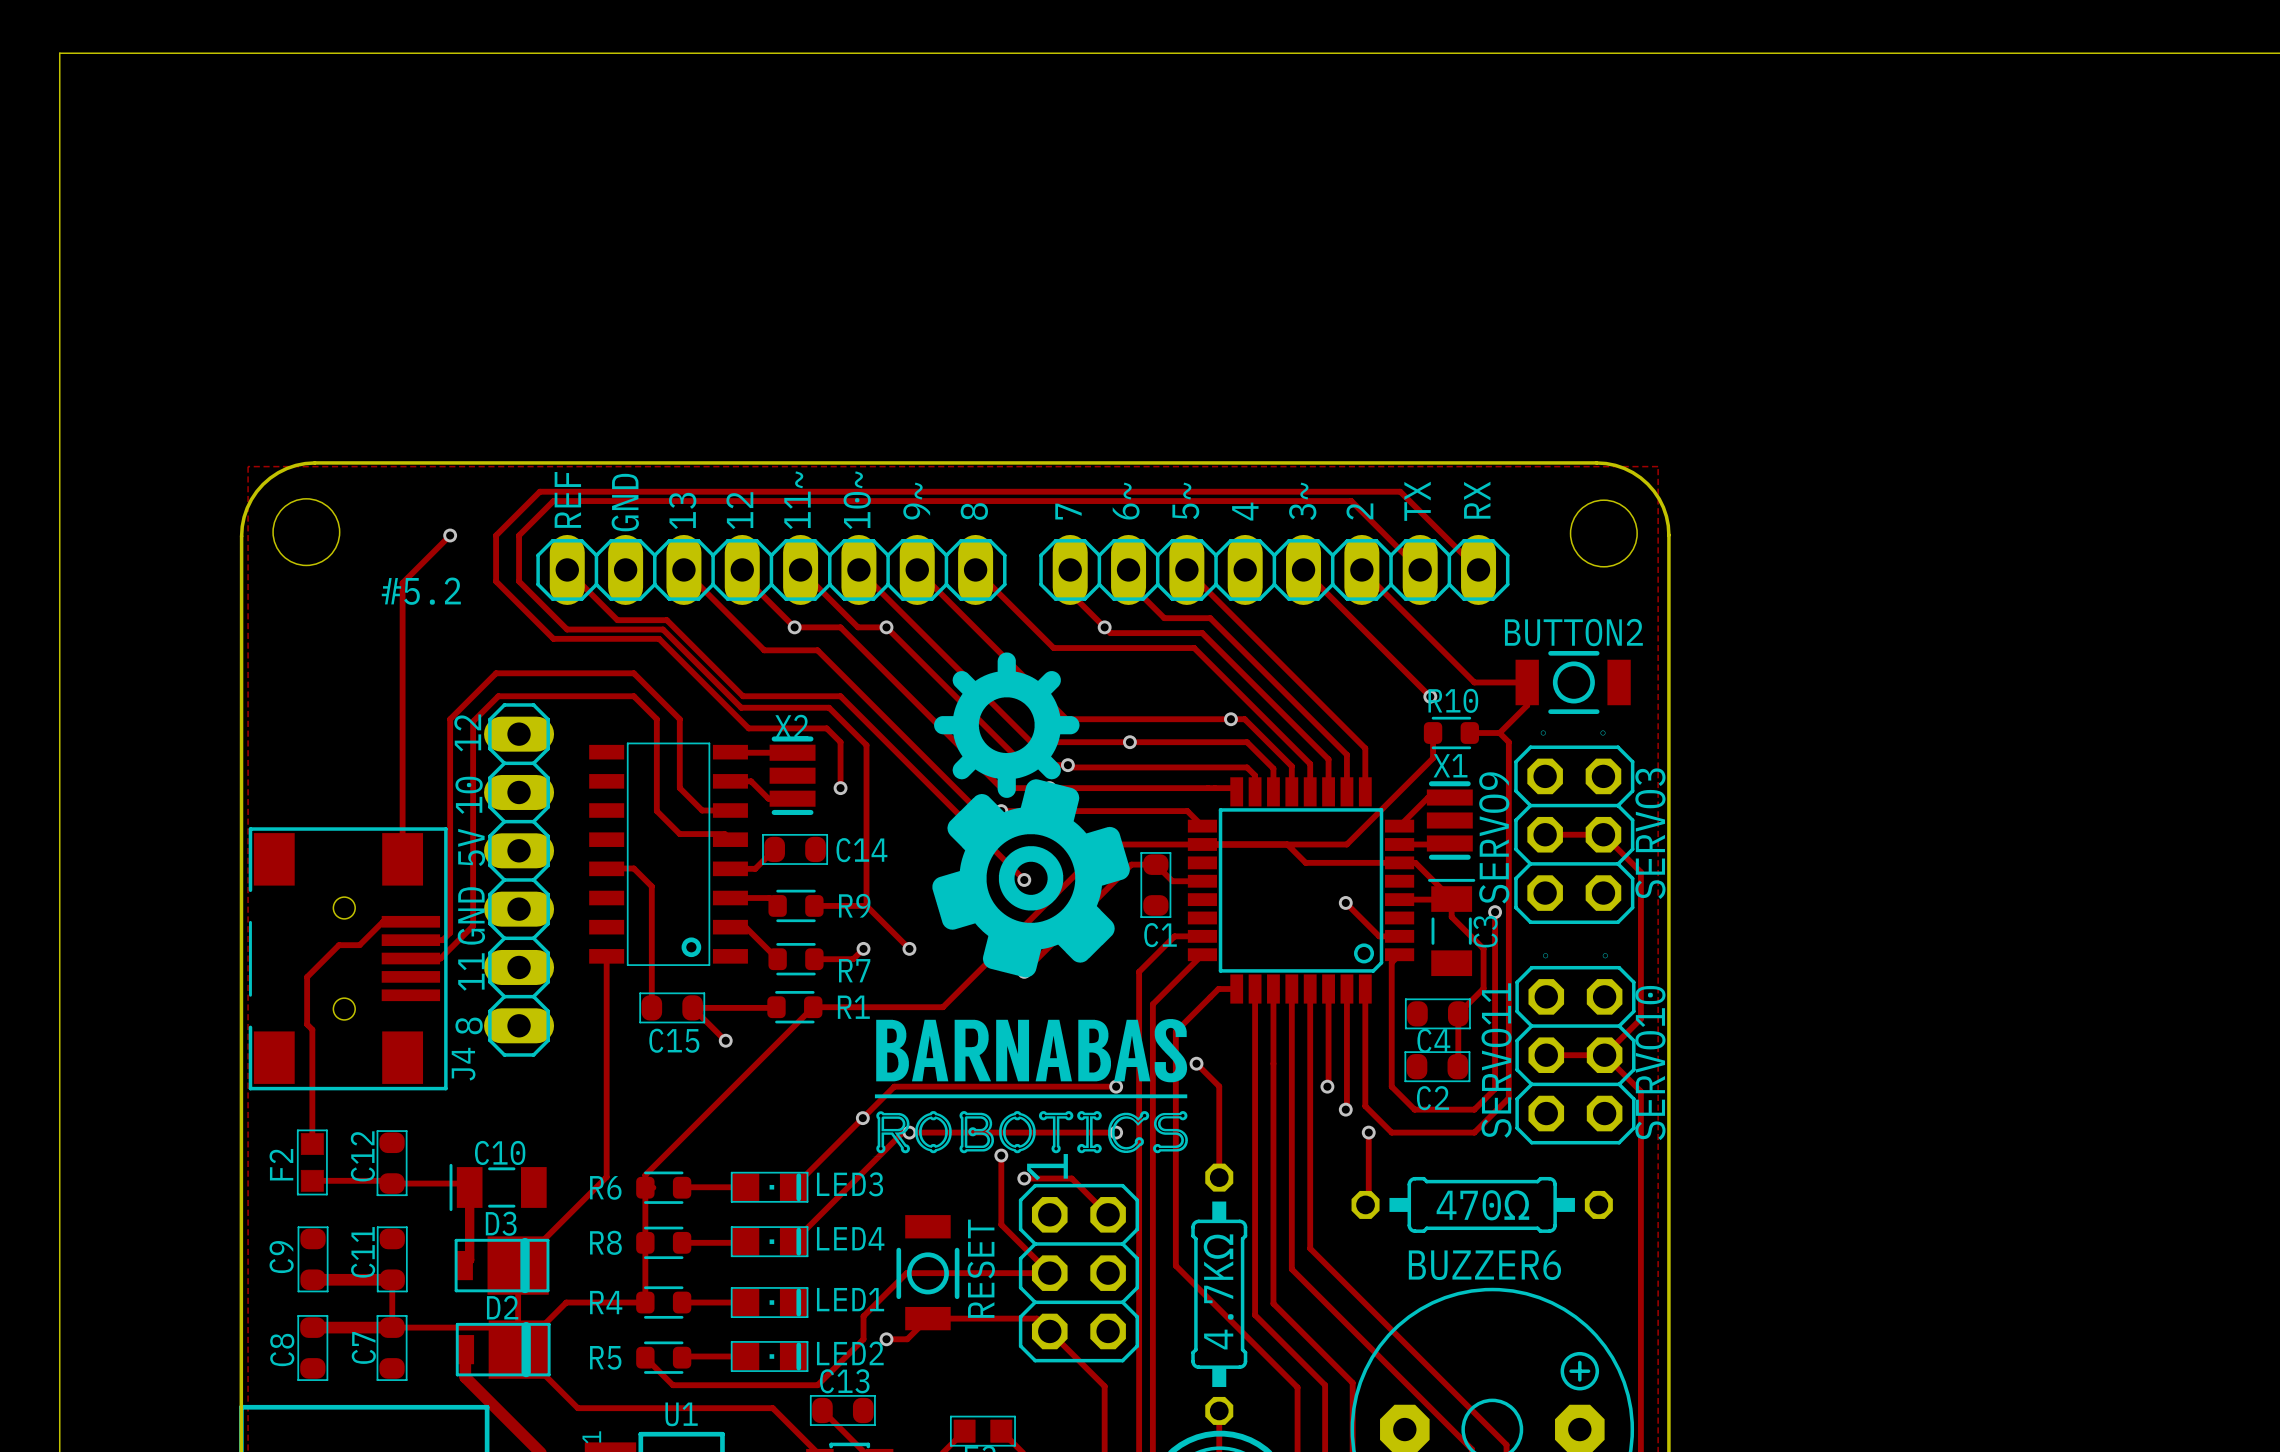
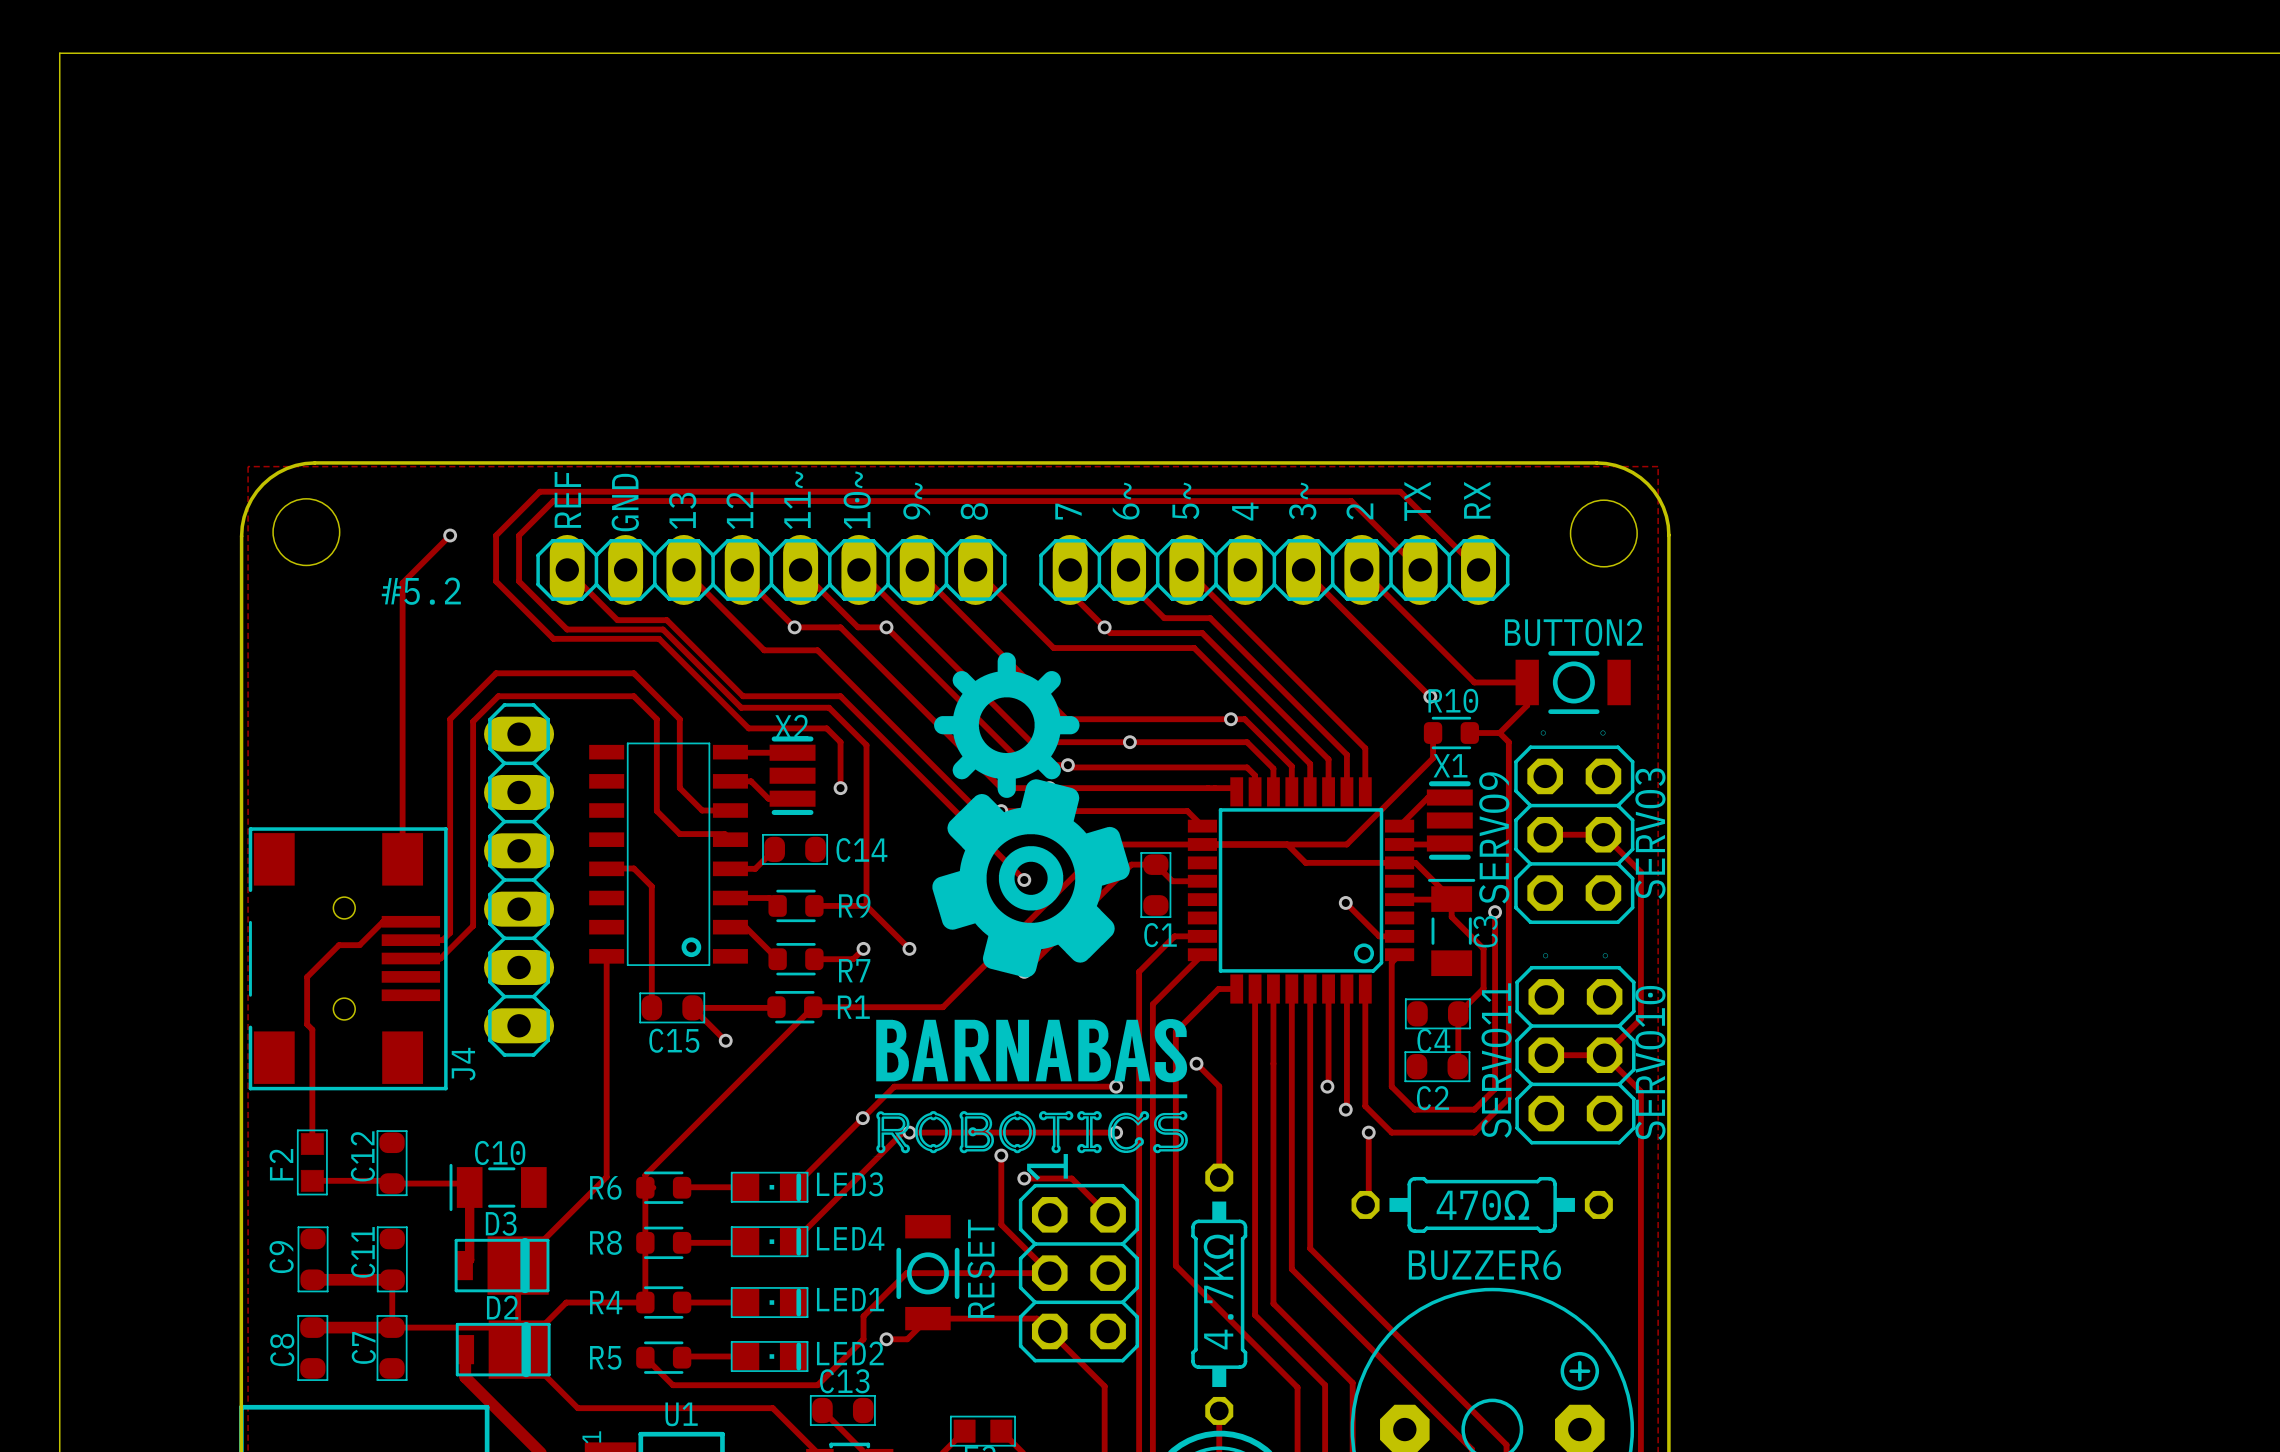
text: 12 (467, 732) -> none
text: 10 (469, 795) -> none
text: 5V (471, 847) -> none
text: GND (471, 915) -> none
text: 11 (471, 971) -> none
text: 8 (469, 1025) -> none

